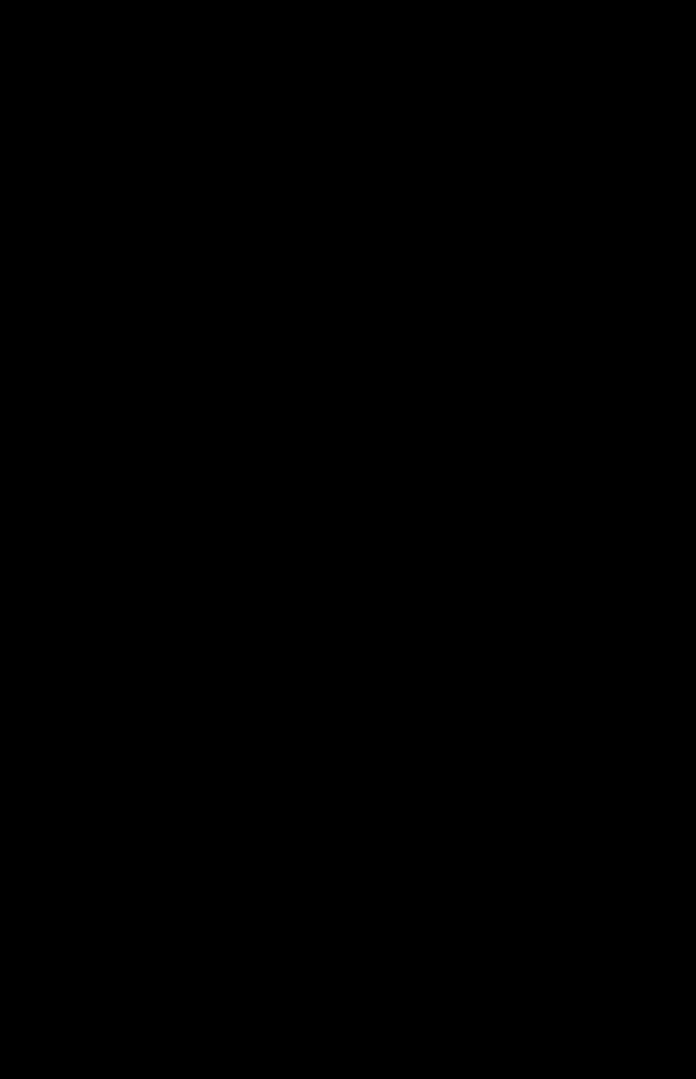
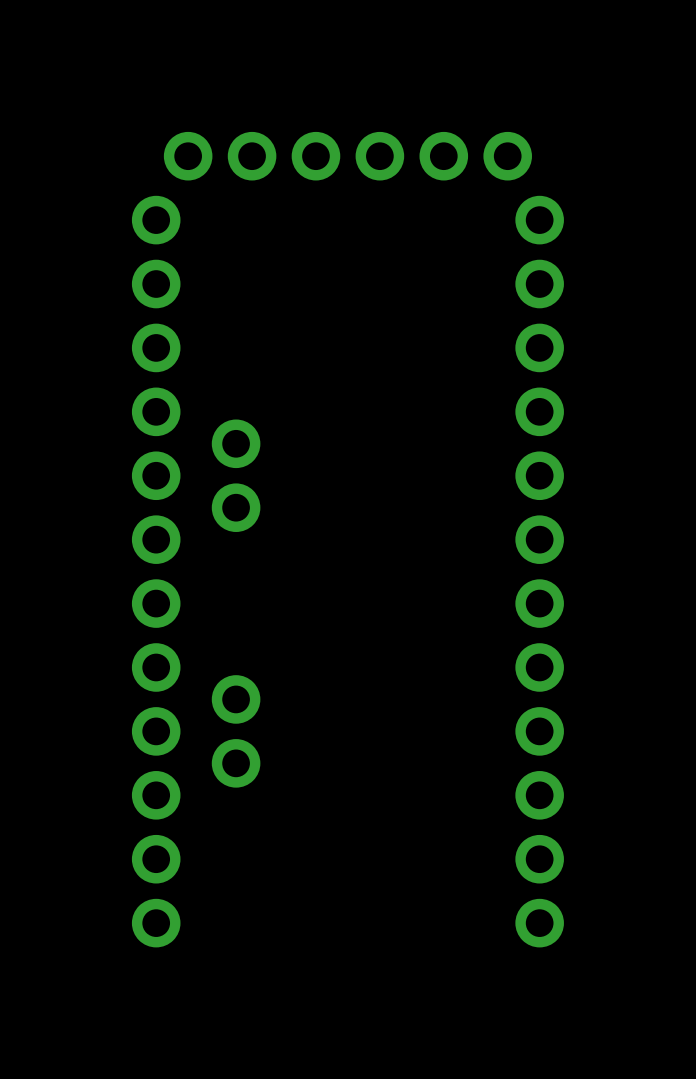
part: none -> (347, 539)

